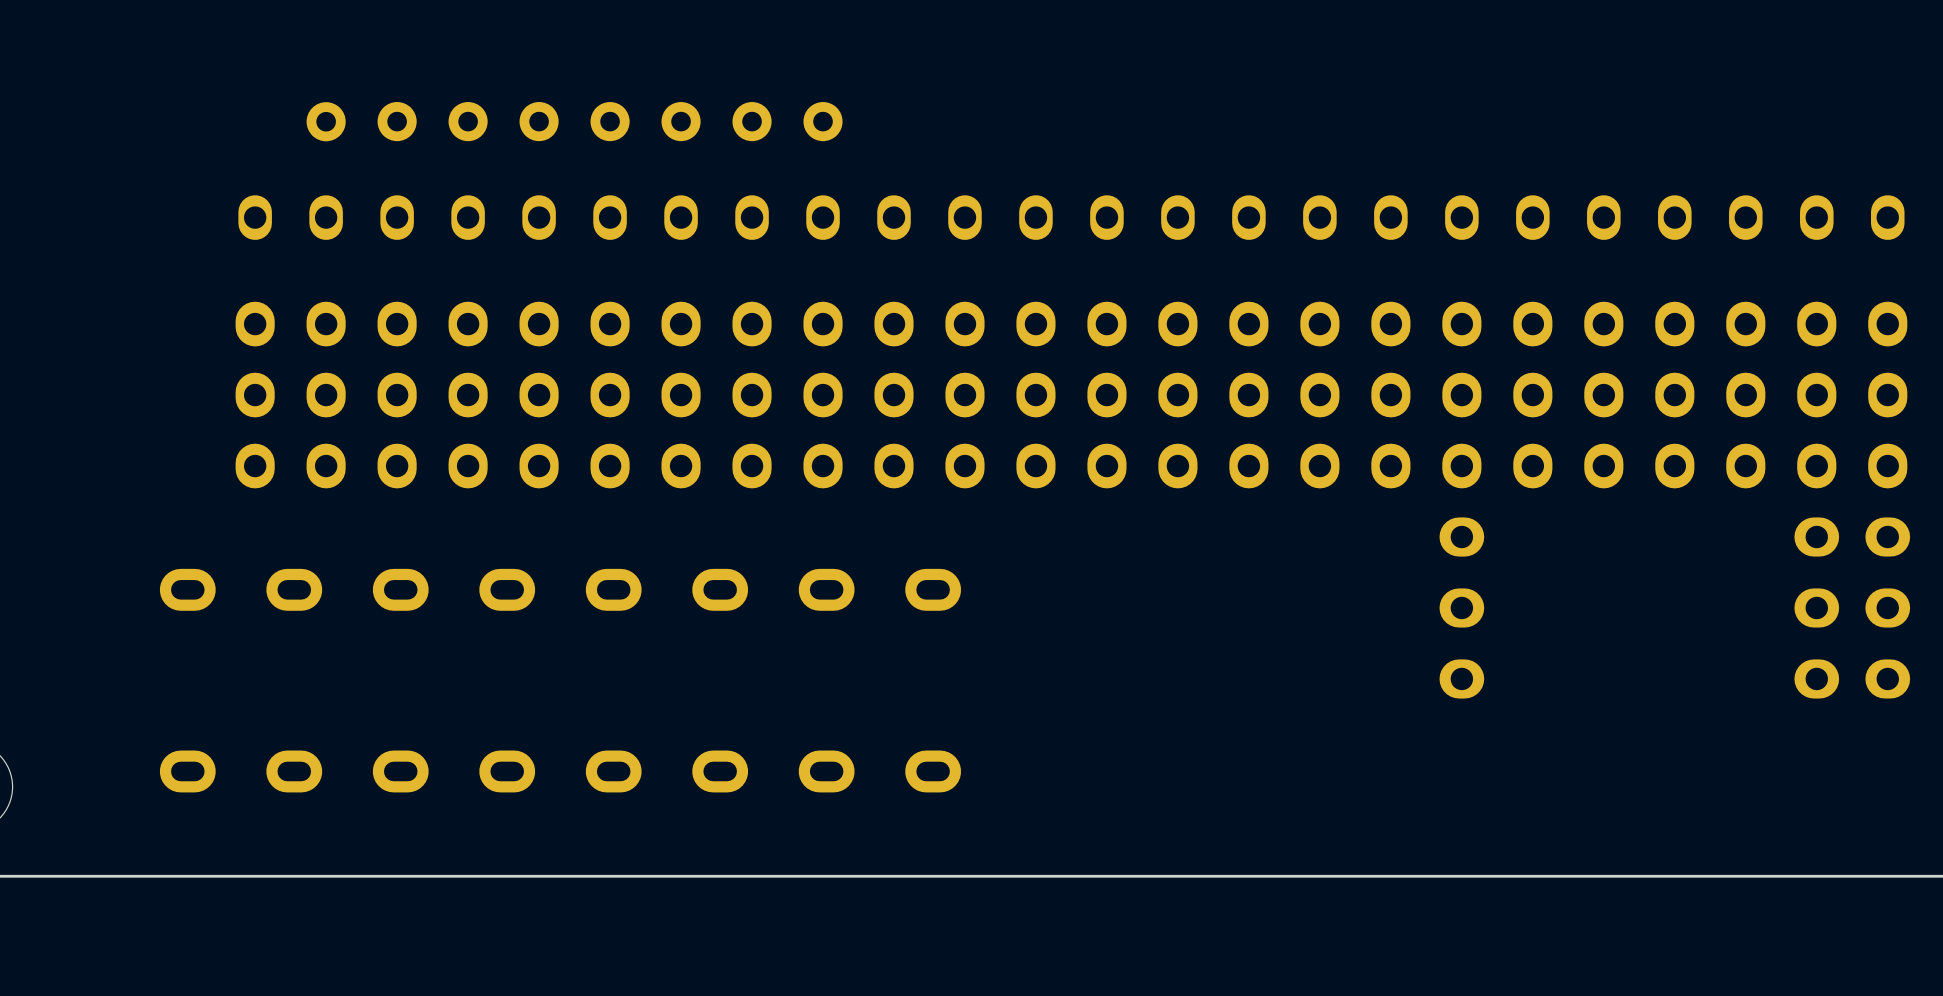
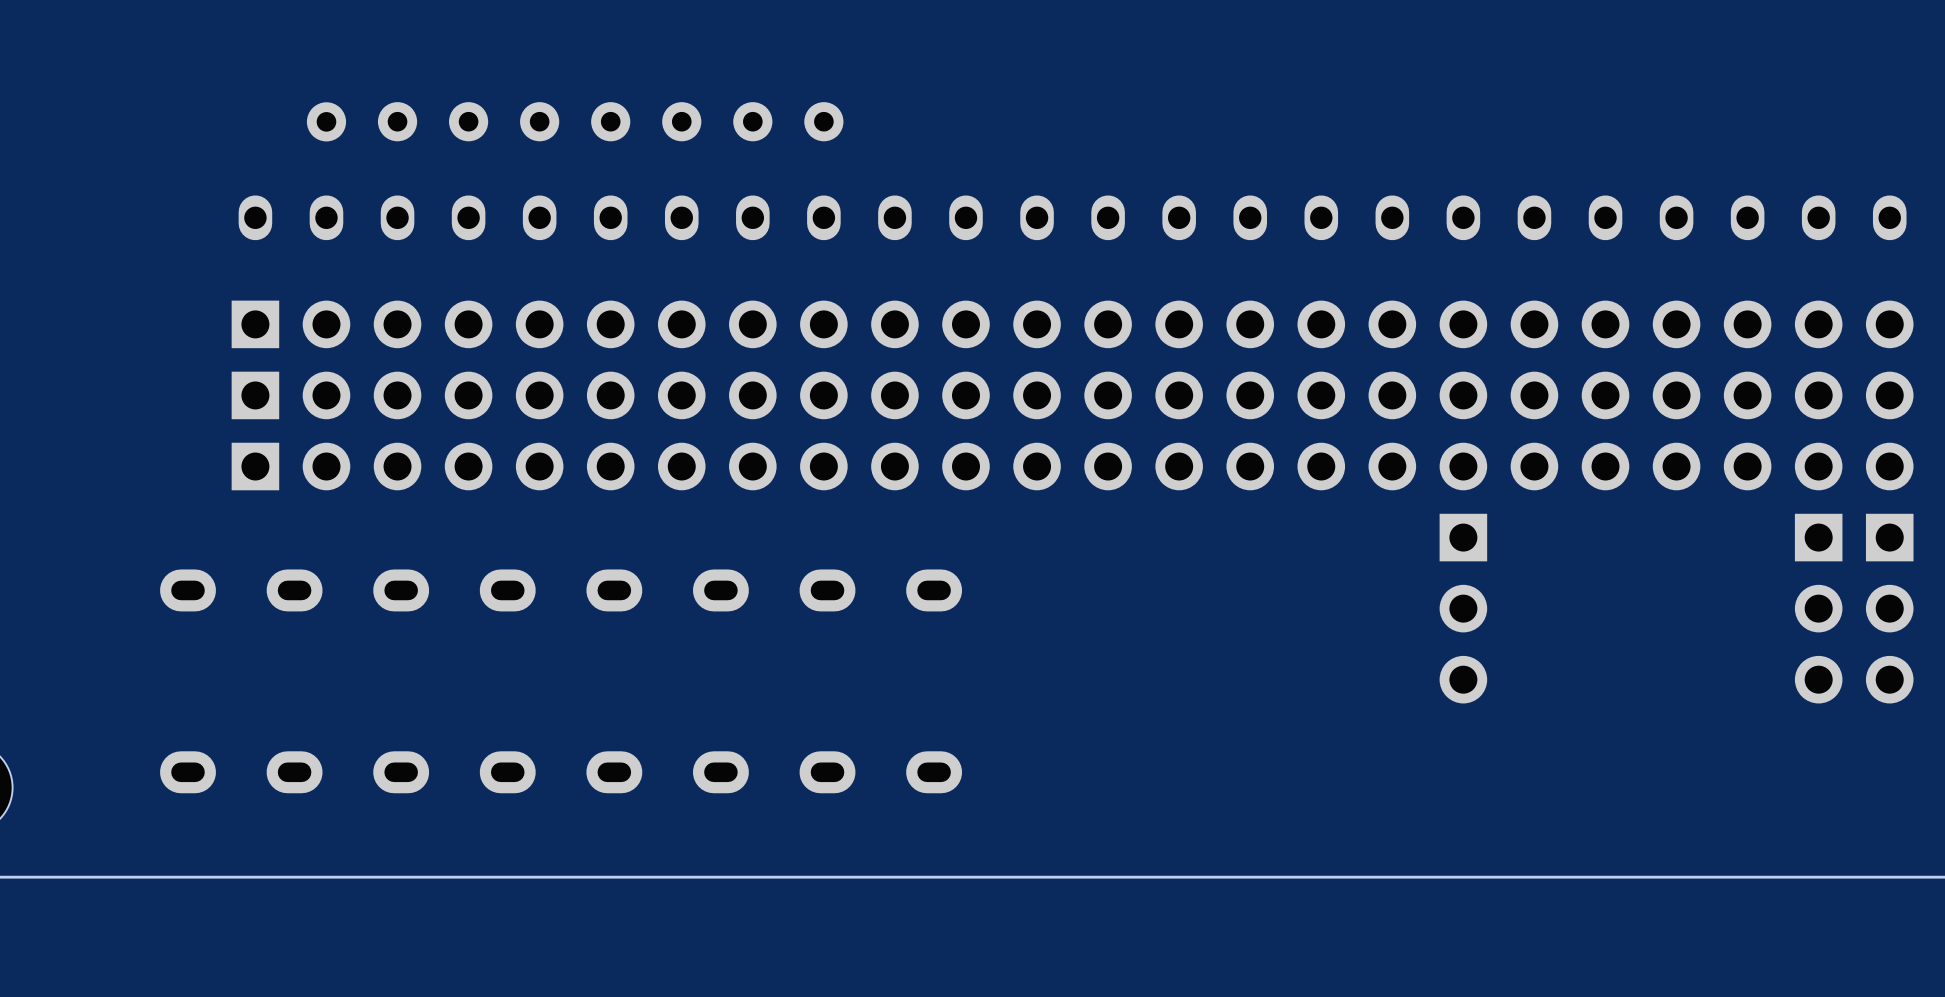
part footprint: [235, 301, 1908, 347] -> [231, 300, 1914, 349]
part footprint: [235, 372, 1908, 418] -> [231, 371, 1914, 420]
part footprint: [235, 443, 1908, 489] -> [231, 442, 1914, 491]
part footprint: [1439, 517, 1485, 699] -> [1439, 513, 1488, 704]
part footprint: [1794, 517, 1840, 699] -> [1794, 513, 1843, 704]
part footprint: [1865, 517, 1911, 699] -> [1865, 513, 1914, 704]

